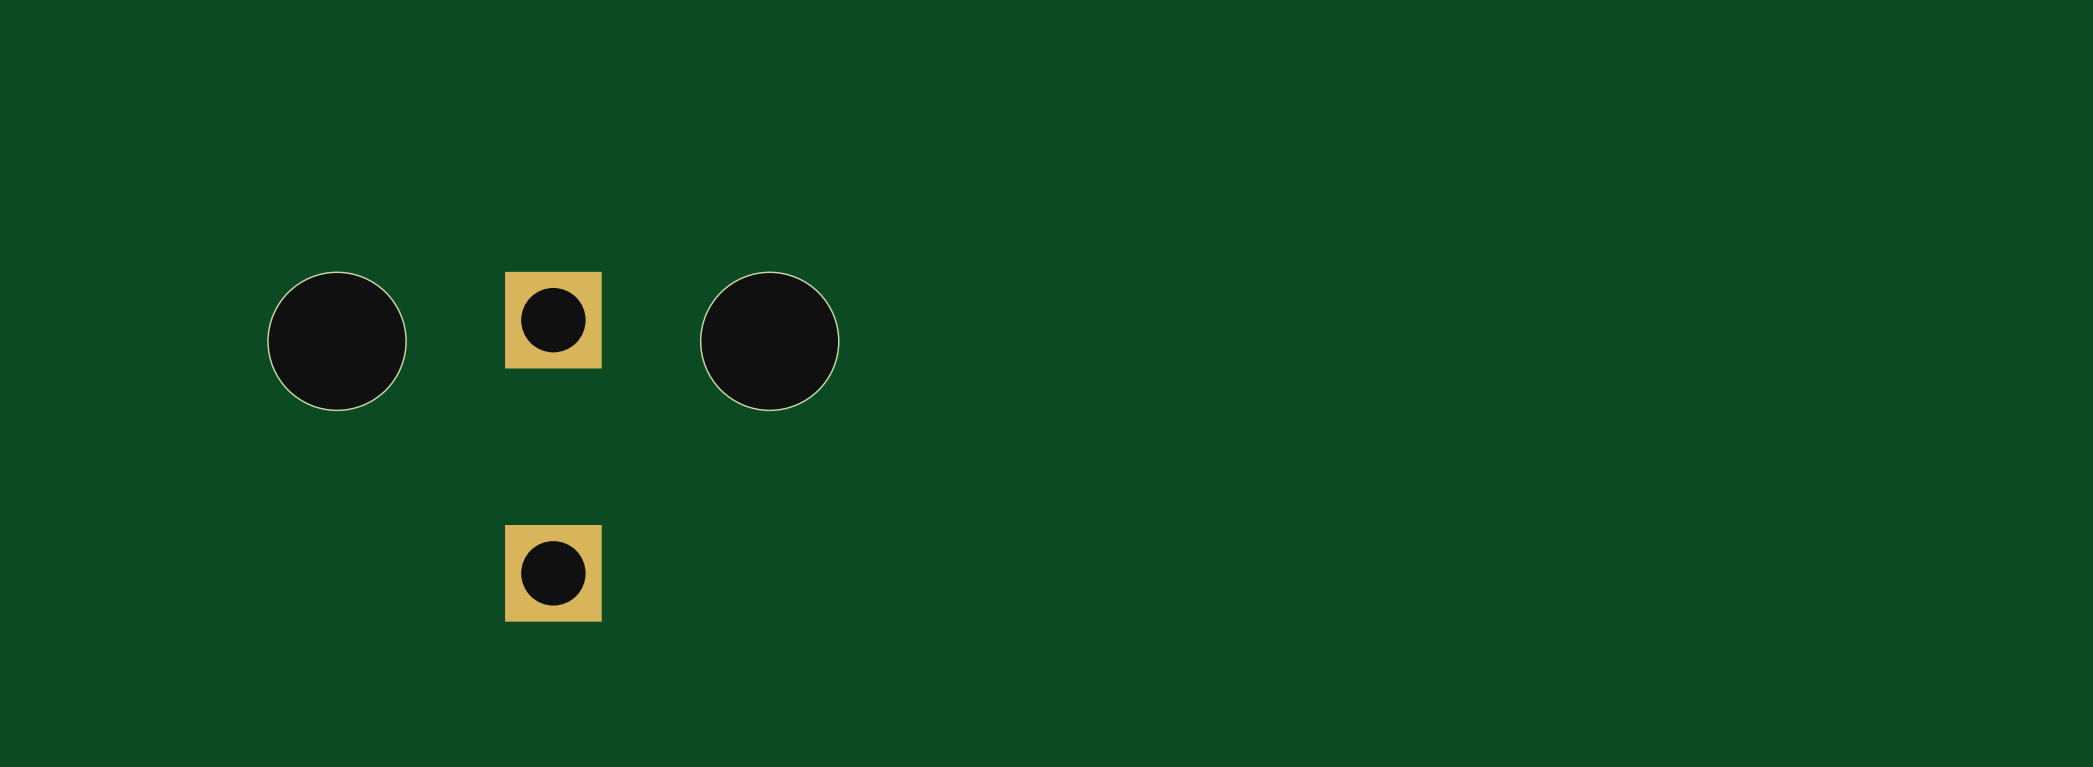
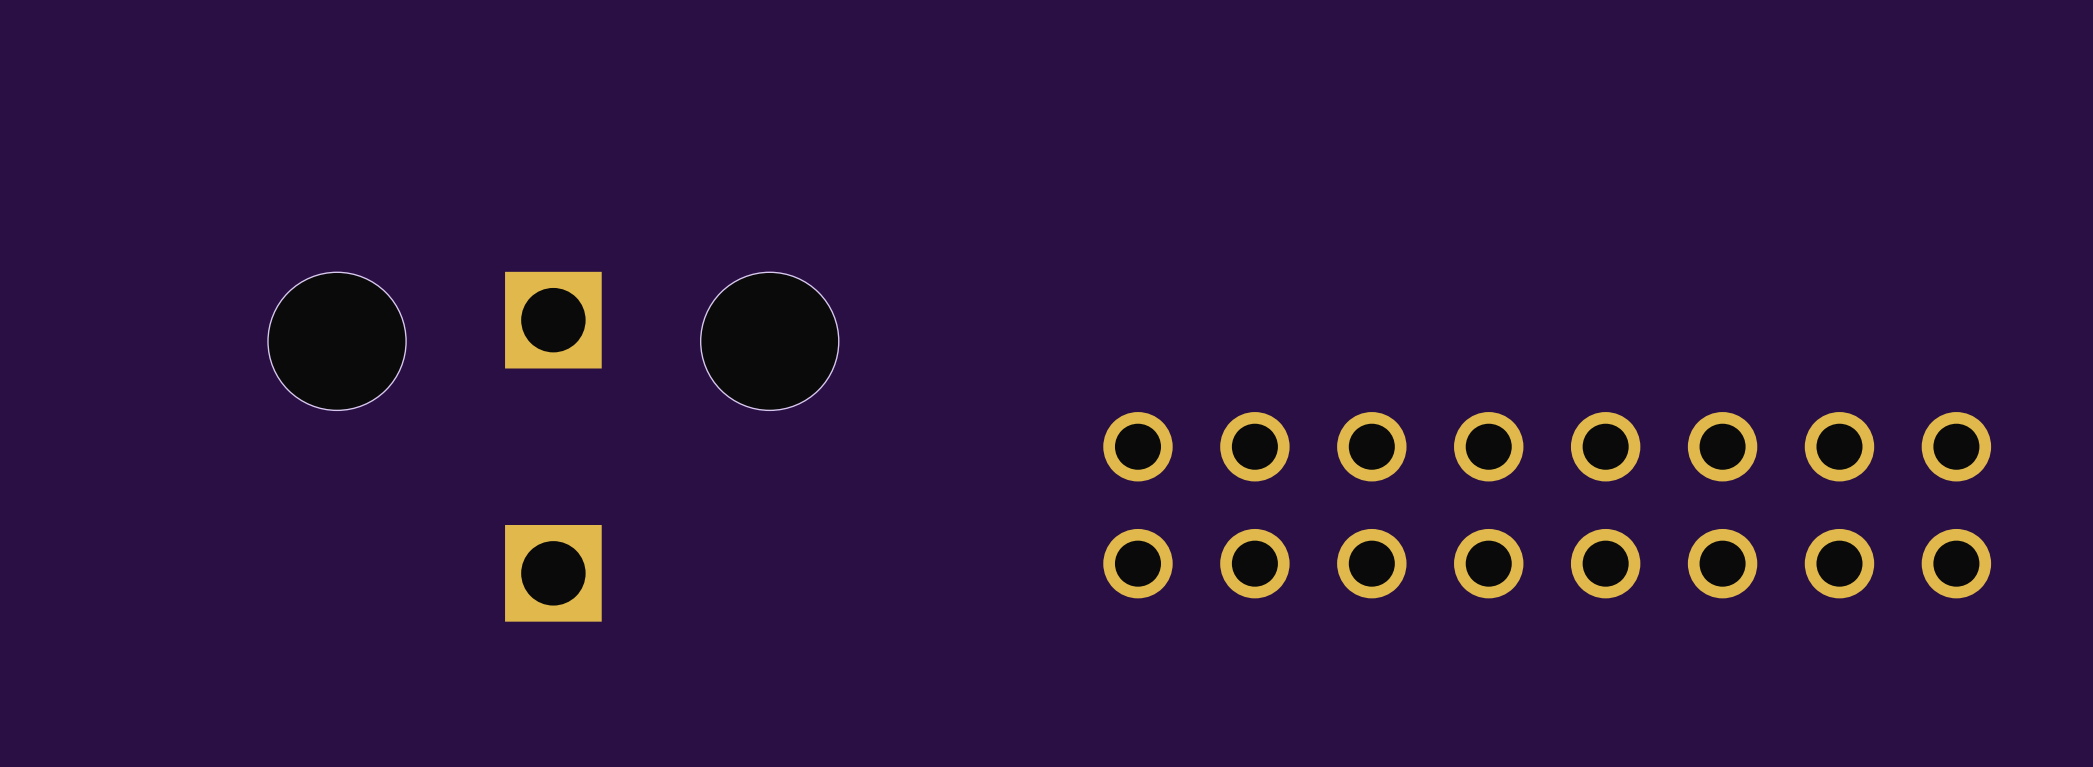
part: none -> (1547, 505)

